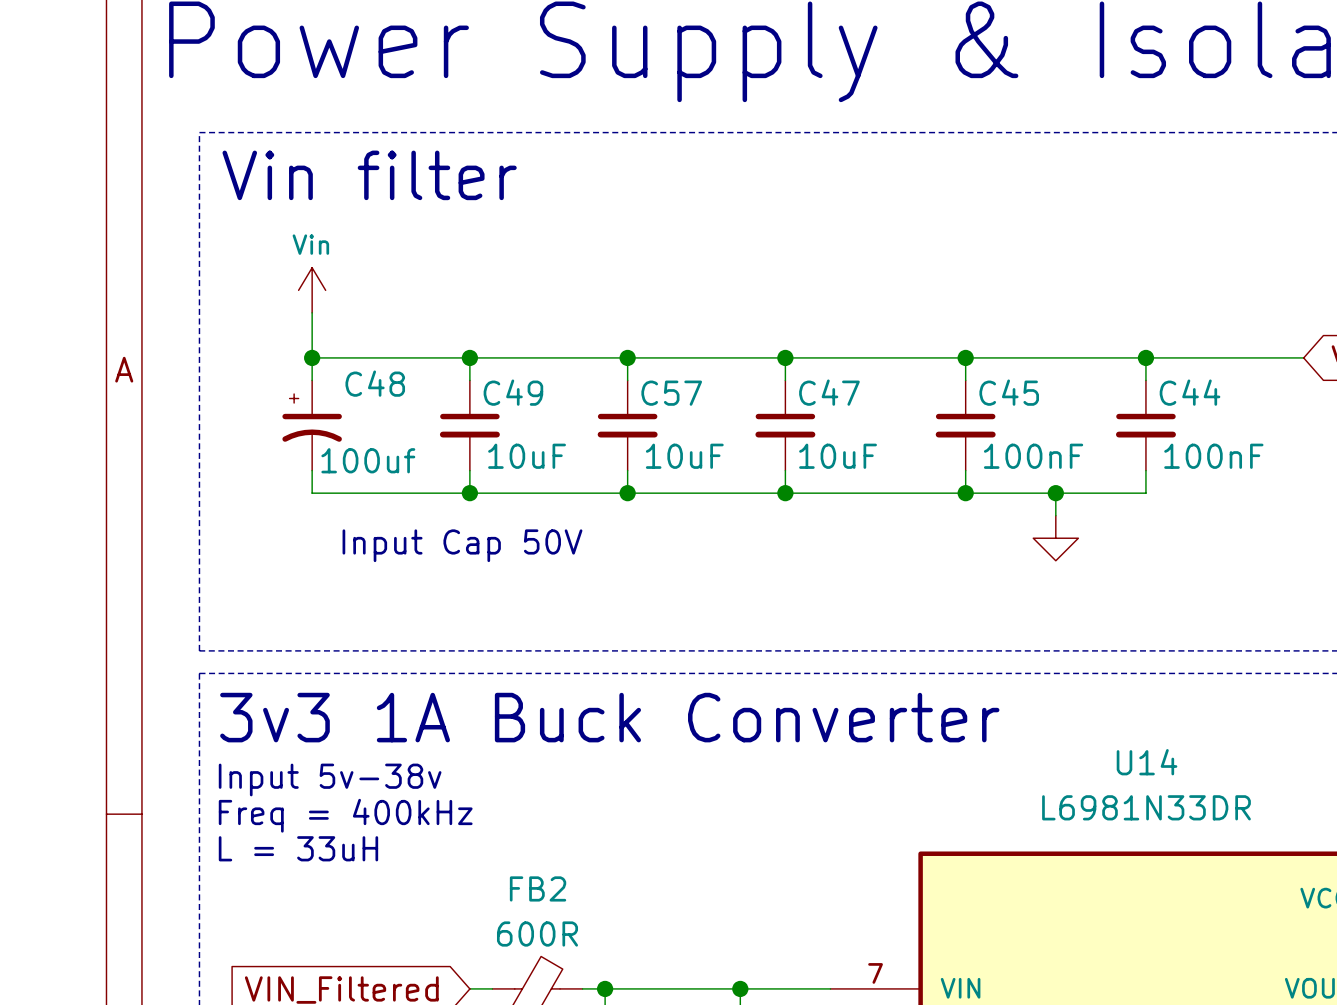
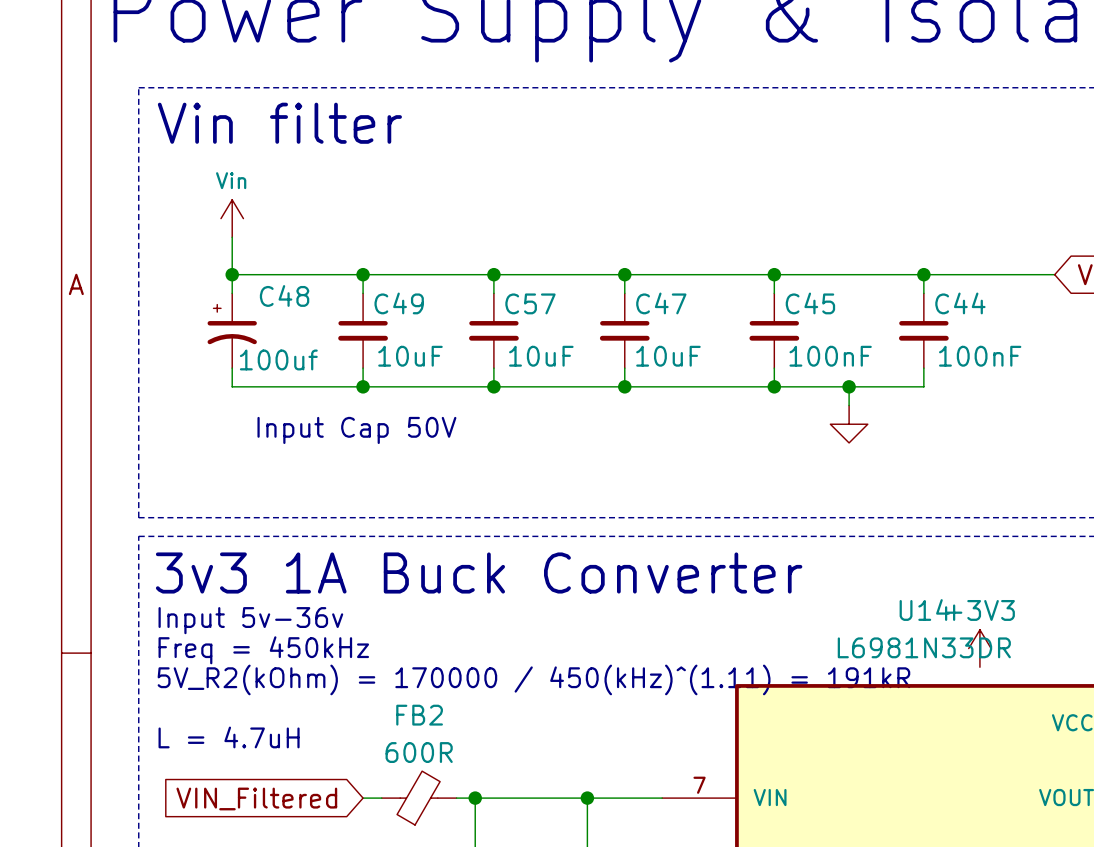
text: Input 5v-38v (330, 779) -> Input 5v-36v (250, 620)
power symbol: none -> +3V3 (979, 648)
text: Freq = 400kHz (345, 815) -> Freq = 450kHz (263, 650)
text: L = 33uH (298, 848) -> 5V_R2(kOhm) = 170000 / 450(kHz)^(1.11) = 191kR (533, 679)
text: none -> L = 4.7uH (229, 737)

